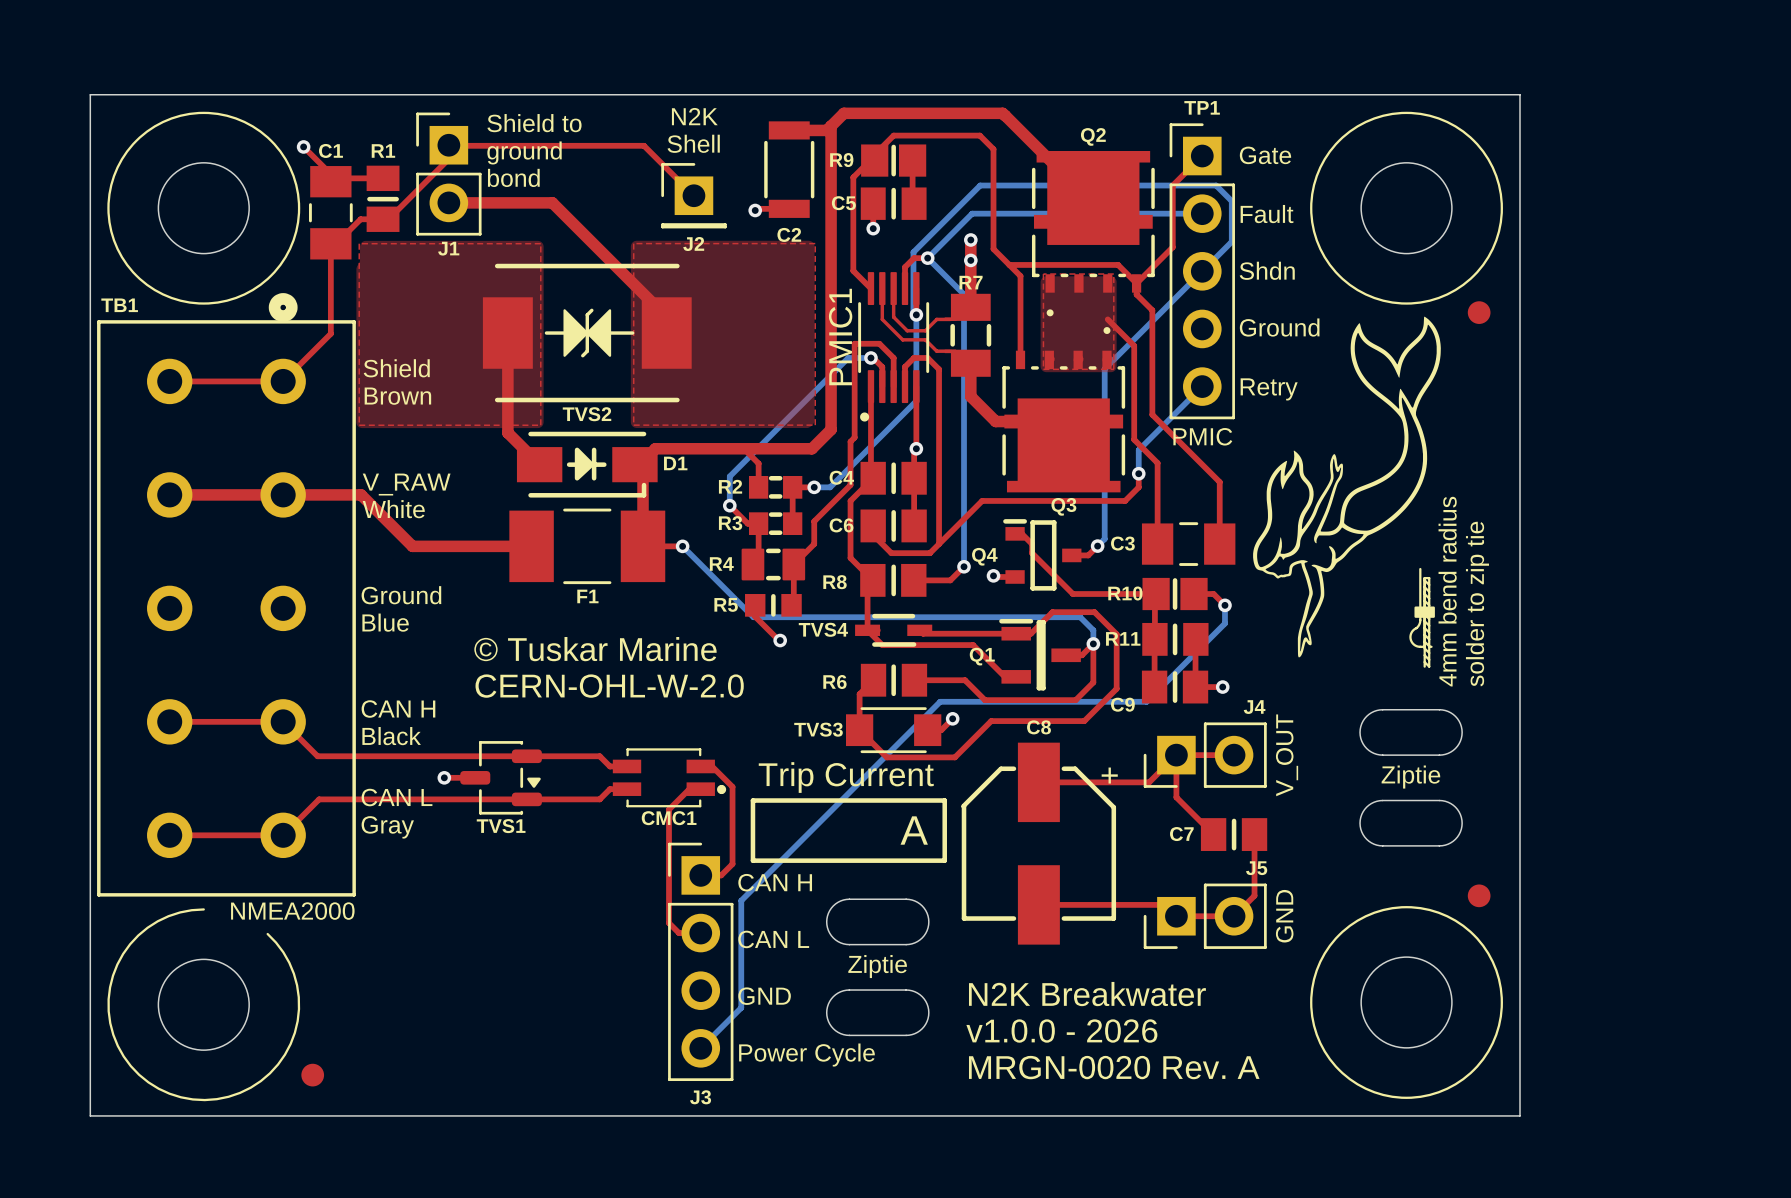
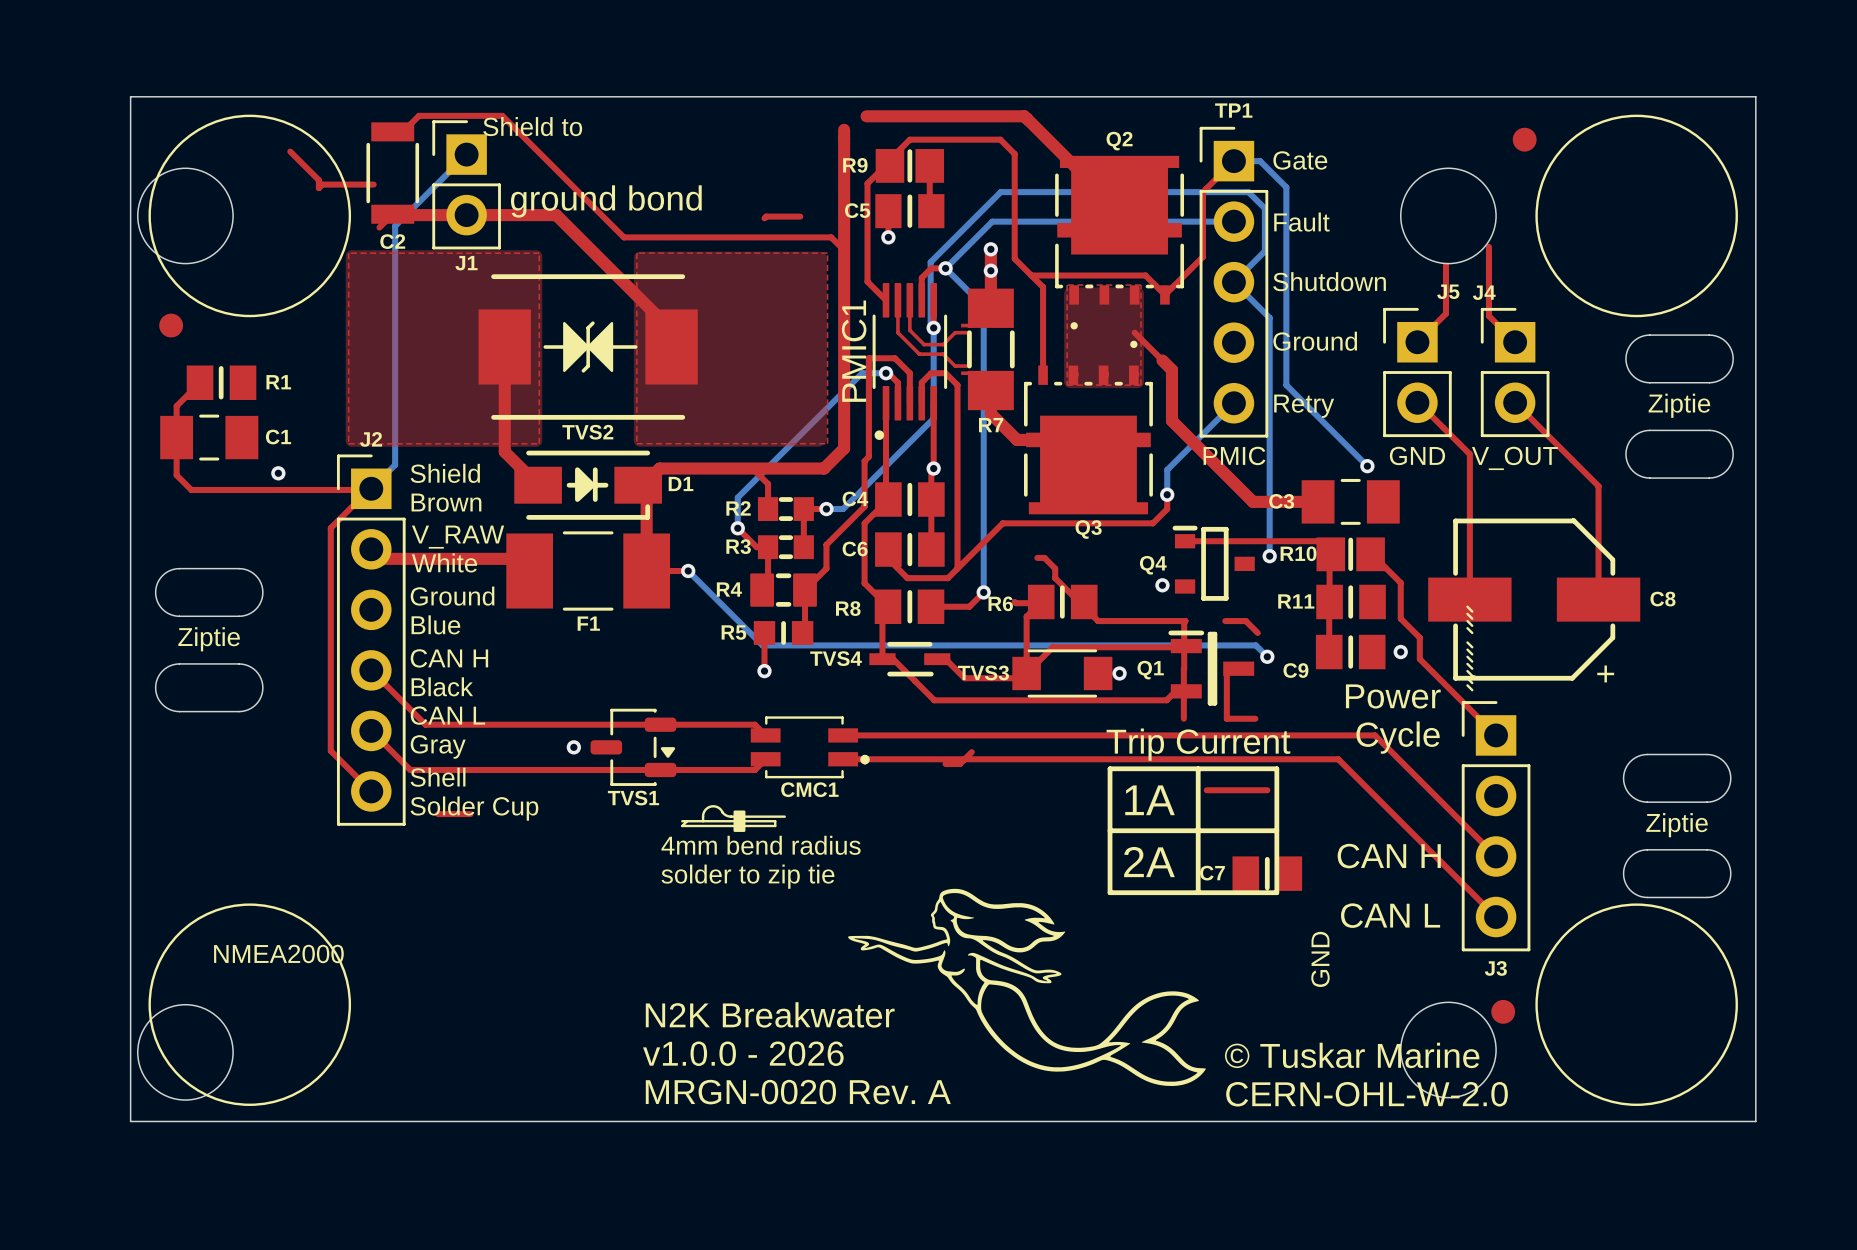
board edge: (151, 94) (90, 94) (90, 1115) (1520, 1115) (1520, 94) -> (130, 96) (130, 1121) (1755, 1121) (1755, 96) (1567, 96)
top track: (852, 113) (843, 113) (826, 130) (789, 130) -> none
text: N2K (694, 116) -> none
top track: none -> (392, 131) (402, 131) (418, 115) (502, 115) (623, 237) (831, 237) (845, 251)
text: Shell (693, 143) -> none
via: (303, 146) -> none
bottom track: none -> (466, 154) (395, 226) (395, 464) (371, 488)
text: ground (524, 152) -> ground bond (606, 201)
bottom track: none -> (1233, 161) (1260, 161) (1286, 187) (1286, 385) (1367, 466)
J2 footprint: [661, 163, 727, 229] -> [336, 454, 406, 826]
C2 position: (789, 169) -> (392, 173)
J1 position: (448, 174) -> (466, 184)
text: bond (513, 177) -> none
top track: (693, 195) (644, 145) (448, 145) (448, 158) (401, 206) -> none
R1 rotation: 0° (383, 198) -> 90° clockwise (221, 382)
R1 position: (383, 198) -> (221, 382)
top track: (448, 202) (552, 202) (557, 207) -> (379, 227) (392, 214) (556, 215)
top track: (400, 207) (388, 219) (360, 219) (336, 243) (330, 243) (330, 333) (283, 381) (169, 381) -> none
drawing position: (203, 208) -> (249, 215)
drawing position: (1406, 208) -> (1636, 215)
via: (755, 210) -> none
C1 rotation: 0° (330, 212) -> 90° clockwise (209, 437)
C1 position: (330, 212) -> (209, 437)
top track: none -> (1445, 246) (1445, 313) (1417, 342)
top track: none -> (1488, 246) (1488, 316) (1519, 347)
J2 name position: J2 (693, 244) -> J2 (371, 439)
text: Shdn (1267, 270) -> Shutdown (1329, 281)
bottom track: (1202, 271) (1104, 368) (1104, 539) (1097, 546) -> (1233, 282) (1269, 317) (1269, 556)
R7 name position: R7 (971, 282) -> R7 (991, 425)
top track: (1136, 283) (1136, 294) (1152, 310) (1152, 414) (1219, 482) (1219, 544) -> none
R7 footprint: [944, 293, 992, 377] -> [961, 288, 1015, 411]
part: none -> (171, 325)
part position: (1479, 312) -> (1524, 139)
drawing: [1253, 316, 1441, 658] -> none
drawing: none -> [1625, 334, 1734, 384]
top track: (1134, 345) (1134, 439) (1157, 463) (1157, 544) -> (1162, 360) (1171, 370) (1171, 420) (1253, 501) (1318, 501)
top track: none -> (200, 382) (176, 406) (176, 475) (191, 489) (371, 488)
text position: Shield (396, 368) -> Shield (445, 473)
top track: none -> (1417, 402) (1469, 454) (1469, 599)
top track: none -> (1515, 402) (1598, 486) (1598, 599)
text: none -> Ziptie (1679, 405)
text position: Brown (397, 396) -> Brown (446, 502)
drawing: none -> [1625, 429, 1734, 479]
text: none -> GND (1417, 455)
via: none -> (1367, 466)
via: none -> (278, 473)
top track: none -> (370, 488) (330, 528) (330, 750) (371, 791)
text position: V_RAW (406, 484) -> V_RAW (458, 537)
top track: (169, 494) (361, 494) (412, 546) (531, 546) -> (371, 549) (380, 558) (517, 558) (529, 571)
text position: White (393, 509) -> White (444, 562)
top track: none -> (1185, 541) (1317, 541) (1330, 554) (1329, 652)
top track: none -> (1370, 554) (1400, 582) (1400, 618) (1419, 637) (1419, 659) (1496, 735)
via: none -> (1269, 556)
drawing: none -> [155, 568, 264, 617]
C3 position: (1188, 544) -> (1350, 501)
top track: (1097, 546) (1088, 555) (1071, 555) -> none
via position: (1097, 546) -> (1162, 585)
Q4 position: (1042, 554) -> (1213, 563)
line: (1420, 569) (1420, 621) (1418, 626) (1411, 632) (1410, 637) (1414, 644) (1424, 646) -> none
via: (993, 575) -> none
top track: none -> (1041, 601) (1026, 616) (1026, 673) (1052, 647) (1186, 646)
text: 4mm bend radius (1447, 591) -> none
TB1: (226, 594) -> none
R10 position: (1175, 594) -> (1350, 554)
text position: Ground (401, 595) -> Ground (452, 596)
text: solder to zip tie (1477, 604) -> none
bottom track: (1224, 605) (1224, 623) (1146, 701) (940, 701) (741, 900) (741, 1007) (700, 1048) -> none
via position: (1224, 605) -> (1267, 656)
text: none -> Ziptie (209, 639)
top track: (755, 616) (780, 640) -> (764, 644) (764, 671)
bottom track: (1080, 617) (1093, 630) (1093, 643) -> (1105, 645) (1255, 645) (1267, 656)
text position: Blue (385, 622) -> Blue (435, 624)
via: none -> (1400, 652)
top track: (867, 630) (882, 645) (973, 645) (1004, 676) (1016, 676) -> none
top track: none -> (893, 659) (934, 700) (1166, 700) (1175, 691) (1186, 691)
top track: (919, 630) (923, 633) (1030, 633) (1052, 612) (1094, 612) (1116, 634) (1116, 688) (1084, 721) (991, 721) (954, 757) (886, 757) (859, 730) (859, 694) (873, 680) -> (937, 659) (945, 659) (964, 678) (1026, 678)
drawing: none -> [155, 663, 264, 713]
R11 position: (1175, 639) -> (1351, 601)
top track: none -> (371, 670) (425, 724) (754, 724) (765, 735)
via position: (780, 640) -> (764, 671)
text: © Tuskar Marine (595, 649) -> none
Q1 position: (1040, 654) -> (1211, 668)
top track: (1066, 655) (1082, 655) (1093, 643) (1093, 682) (1075, 700) (984, 700) (965, 680) (914, 680) -> none
line: (1424, 662) (1429, 666) (1429, 578) (1424, 578) (1424, 666) -> none
text: none -> Power (1393, 696)
R6 position: (893, 680) -> (1062, 601)
text: CERN-OHL-W-2.0 (609, 686) -> none
C9 position: (1175, 687) -> (1350, 652)
via: (1222, 687) -> none
top track: none -> (371, 730) (410, 769) (754, 769) (765, 759)
top track: none -> (843, 735) (1375, 735) (1496, 856)
text: none -> Cycle (1398, 737)
J4 name position: J4 (1254, 707) -> J4 (1484, 292)
text position: CAN H (398, 709) -> CAN H (449, 658)
drawing: [1359, 709, 1463, 756] -> none
via: none -> (573, 747)
via: (952, 718) -> none
drawing: none -> [1622, 753, 1732, 803]
top track: (169, 721) (283, 721) (317, 756) (599, 756) (609, 766) (627, 766) -> none
top track: none -> (843, 759) (1338, 759) (1496, 917)
TVS3 position: (893, 730) -> (1062, 673)
line: none -> (1110, 768) (1276, 768) (1276, 892) (1110, 892) (1110, 768)
line: none -> (1198, 768) (1198, 892)
text position: Black (391, 736) -> Black (442, 686)
text: none -> Shell (438, 777)
J4 rotation: 0° (1205, 755) -> 90° clockwise (1515, 372)
J4 position: (1205, 755) -> (1515, 372)
text rotation: 0° (1287, 755) -> 90° clockwise (1514, 458)
text position: V_OUT (1287, 755) -> V_OUT (1514, 458)
text: none -> 1A (1150, 800)
top track: (700, 766) (712, 766) (732, 786) (732, 864) (721, 875) (700, 875) -> none
text: none -> Solder Cup (474, 808)
drawing: none -> [733, 810, 746, 832]
via: (444, 777) -> none
TVS1 position: (501, 777) -> (633, 747)
CMC1 position: (669, 777) -> (810, 747)
text position: Trip Current (846, 777) -> Trip Current (1198, 744)
text position: Ziptie (1410, 777) -> Ziptie (1677, 825)
line: none -> (784, 816) (729, 816) (724, 814) (718, 807) (712, 806) (705, 810) (703, 821)
top track: (1038, 782) (1149, 782) (1176, 755) (1176, 797) (1213, 834) -> none
line: none -> (682, 821) (775, 821) (775, 825) (682, 825) (687, 821)
top track: (627, 789) (609, 789) (599, 799) (319, 799) (283, 835) (169, 835) -> none
top track: (700, 789) (689, 789) (668, 809) (668, 923) (678, 933) (700, 933) -> none
line: none -> (1110, 830) (1276, 830)
text position: CAN L (397, 797) -> CAN L (447, 715)
drawing: [1359, 799, 1463, 847] -> none
line: (752, 800) (944, 800) (944, 860) (752, 860) (752, 800) -> none
text: none -> 4mm bend radius (761, 845)
drawing: none -> [1622, 849, 1732, 899]
text: none -> CAN H (1389, 856)
text: none -> 2A (1149, 862)
text position: Gray (387, 827) -> Gray (438, 746)
text: A (914, 830) -> none
top track: (1254, 834) (1254, 895) (1234, 916) (1176, 916) (1165, 904) (1038, 904) -> none
text: none -> solder to zip tie (747, 876)
C8 rotation: 0° (1038, 843) -> 90° clockwise (1534, 599)
C8 position: (1038, 843) -> (1534, 599)
drawing: none -> [848, 888, 1206, 1087]
drawing: none -> [148, 903, 352, 1106]
text: none -> CAN L (1390, 915)
text: CAN H (775, 882) -> none
part position: (1479, 895) -> (1503, 1011)
drawing: [826, 898, 930, 946] -> none
line: (203, 909) (179, 912) (157, 921) (147, 927) (138, 935) (123, 953) (113, 975) (110, 987) (108, 1011) (110, 1023) (117, 1045) (123, 1056) (139, 1074) (158, 1088) (169, 1093) (192, 1099) (204, 1100) (216, 1099) (239, 1092) (250, 1087) (269, 1073) (284, 1054) (290, 1044) (297, 1021) (298, 997) (293, 973) (289, 962) (283, 952) (267, 934) -> none
J5 rotation: 0° (1205, 916) -> 90° clockwise (1417, 372)
J5 position: (1205, 916) -> (1417, 372)
text: CAN L (773, 939) -> none
J3 position: (700, 961) -> (1496, 826)
text: Ziptie (877, 966) -> none
drawing: [826, 989, 930, 1036] -> none
text position: N2K Breakwater (1087, 994) -> N2K Breakwater (770, 1014)
text: GND (764, 996) -> none
drawing position: (1406, 1002) -> (1636, 1004)
text: none -> © Tuskar Marine (1352, 1055)
text position: v1.0.0 - 2026 (1061, 1031) -> v1.0.0 - 2026 (743, 1053)
text: none -> CERN-OHL-W-2.0 (1367, 1094)
text: Power Cycle (806, 1055) -> none
text position: MRGN-0020 Rev. A (1114, 1067) -> MRGN-0020 Rev. A (798, 1092)
part: (312, 1075) -> none

